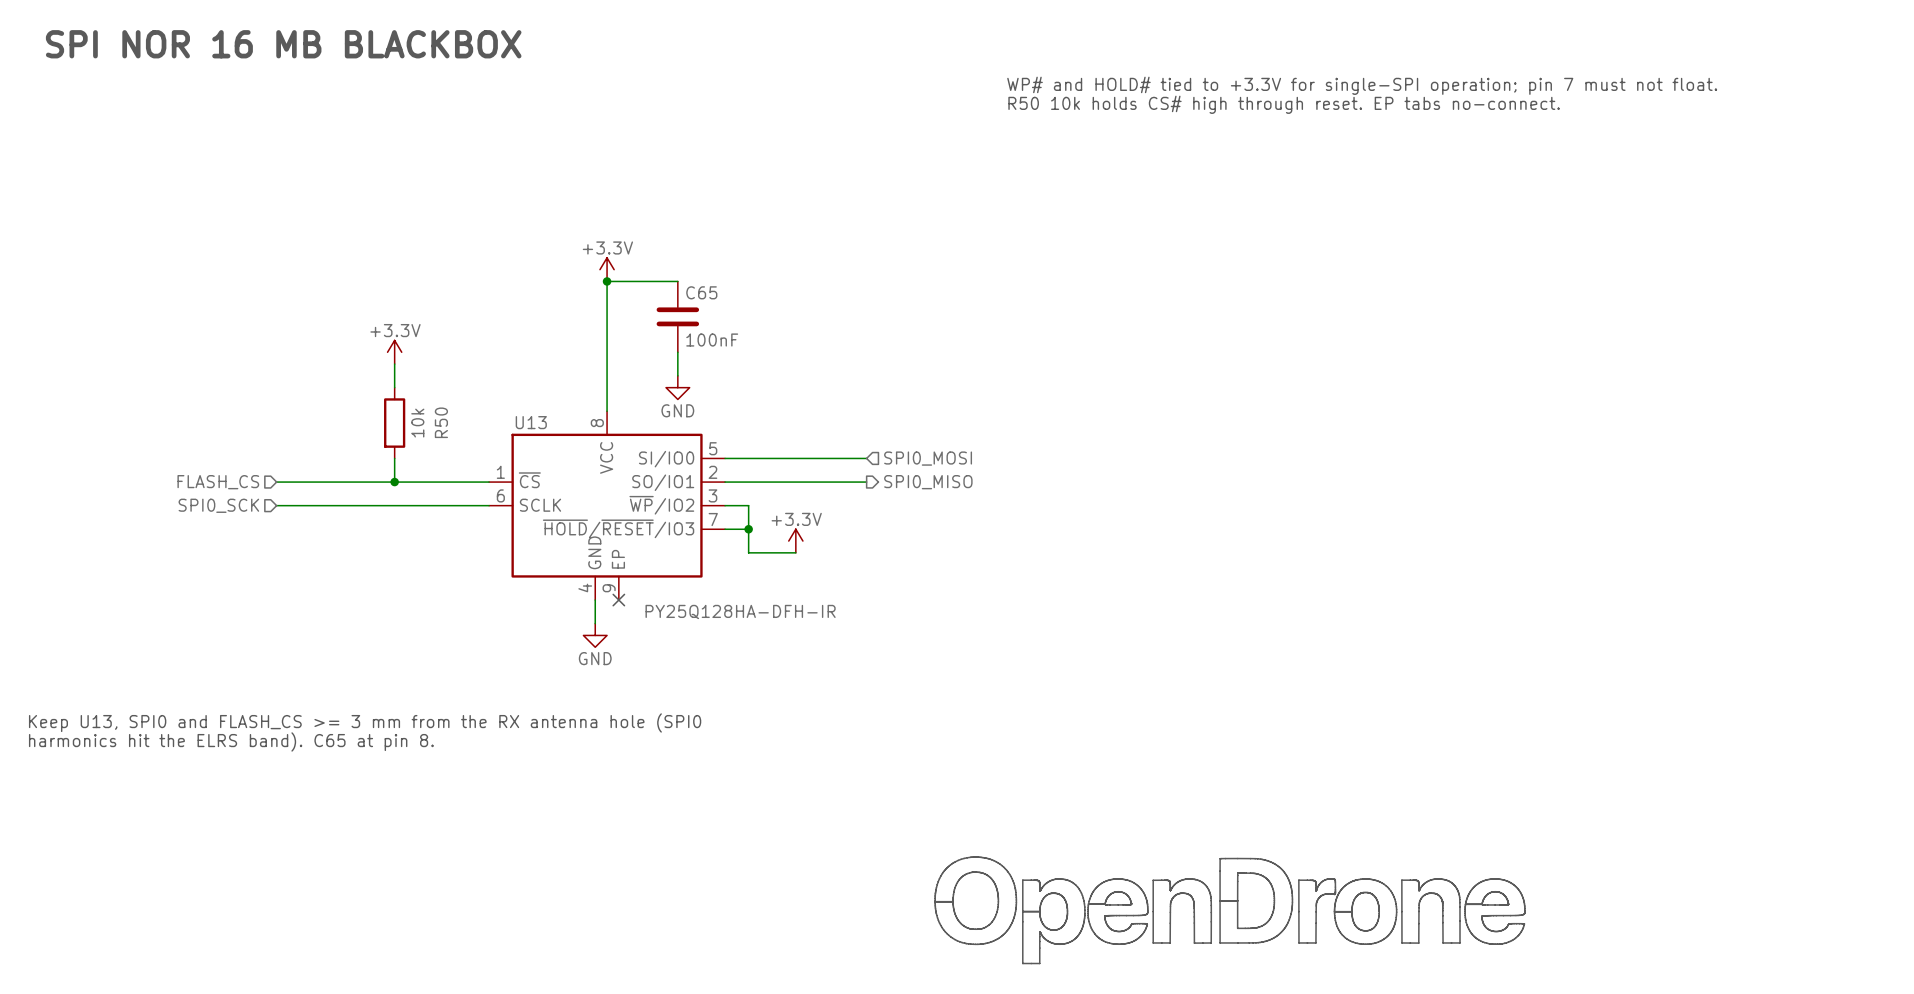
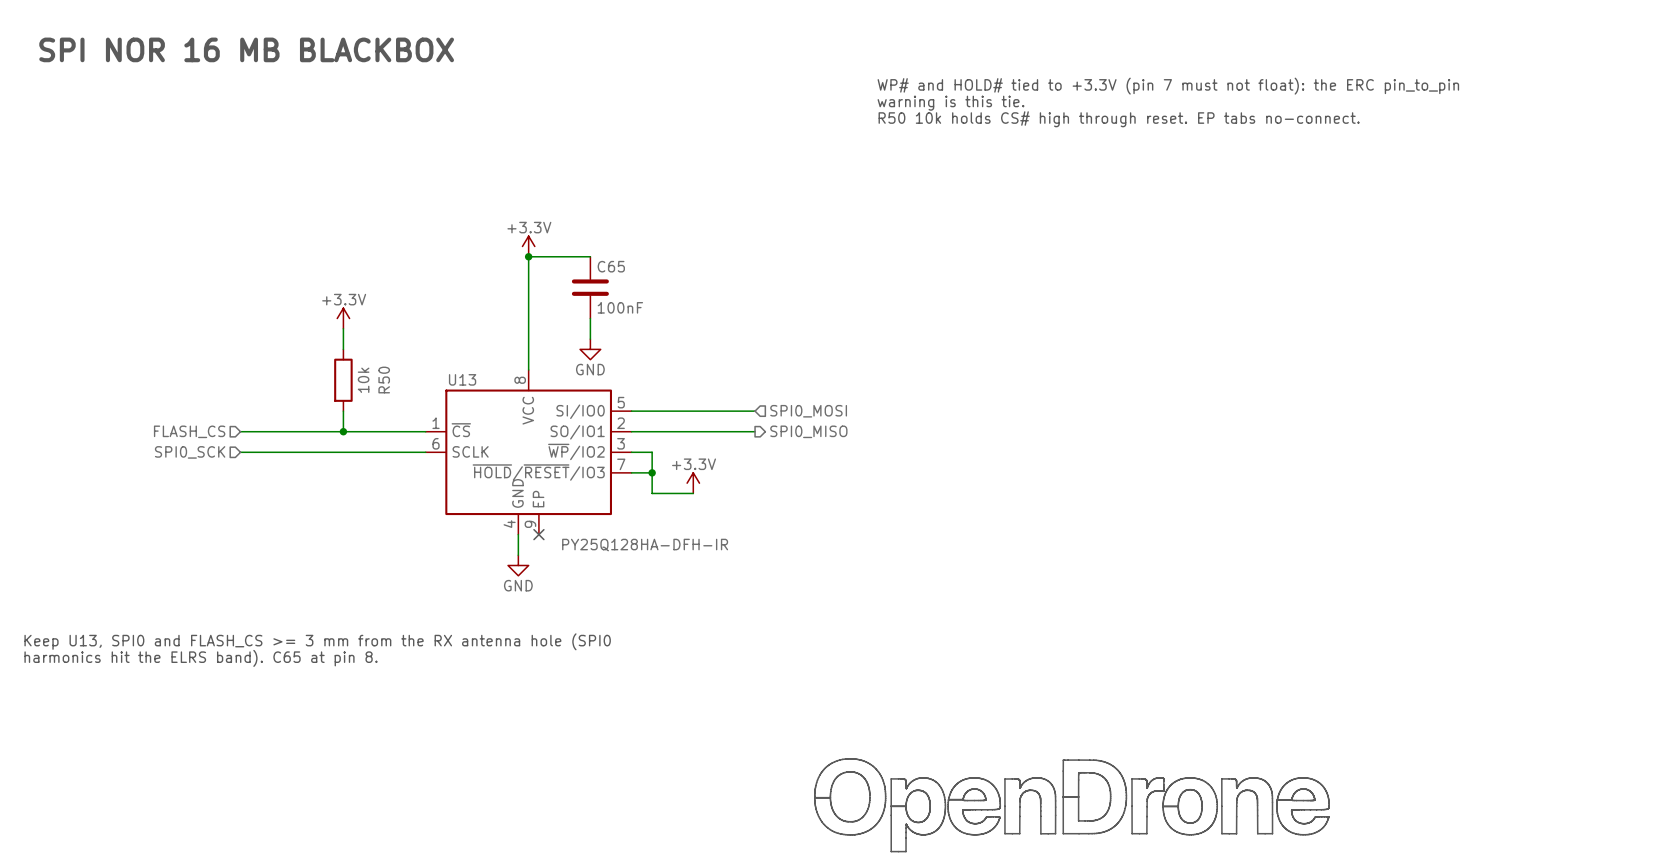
text: WP# and HOLD# tied to +3.3V for single-SPI operation; pin 7 must not float. (1362, 85) -> WP# and HOLD# tied to +3.3V (pin 7 must not float): the ERC pin_to_pin (1168, 86)
text: R50 10k holds CS# high through reset. EP tabs no-connect. (1284, 104) -> warning is this tie. (951, 103)
text: none -> R50 10k holds CS# high through reset. EP tabs no-connect. (1119, 119)

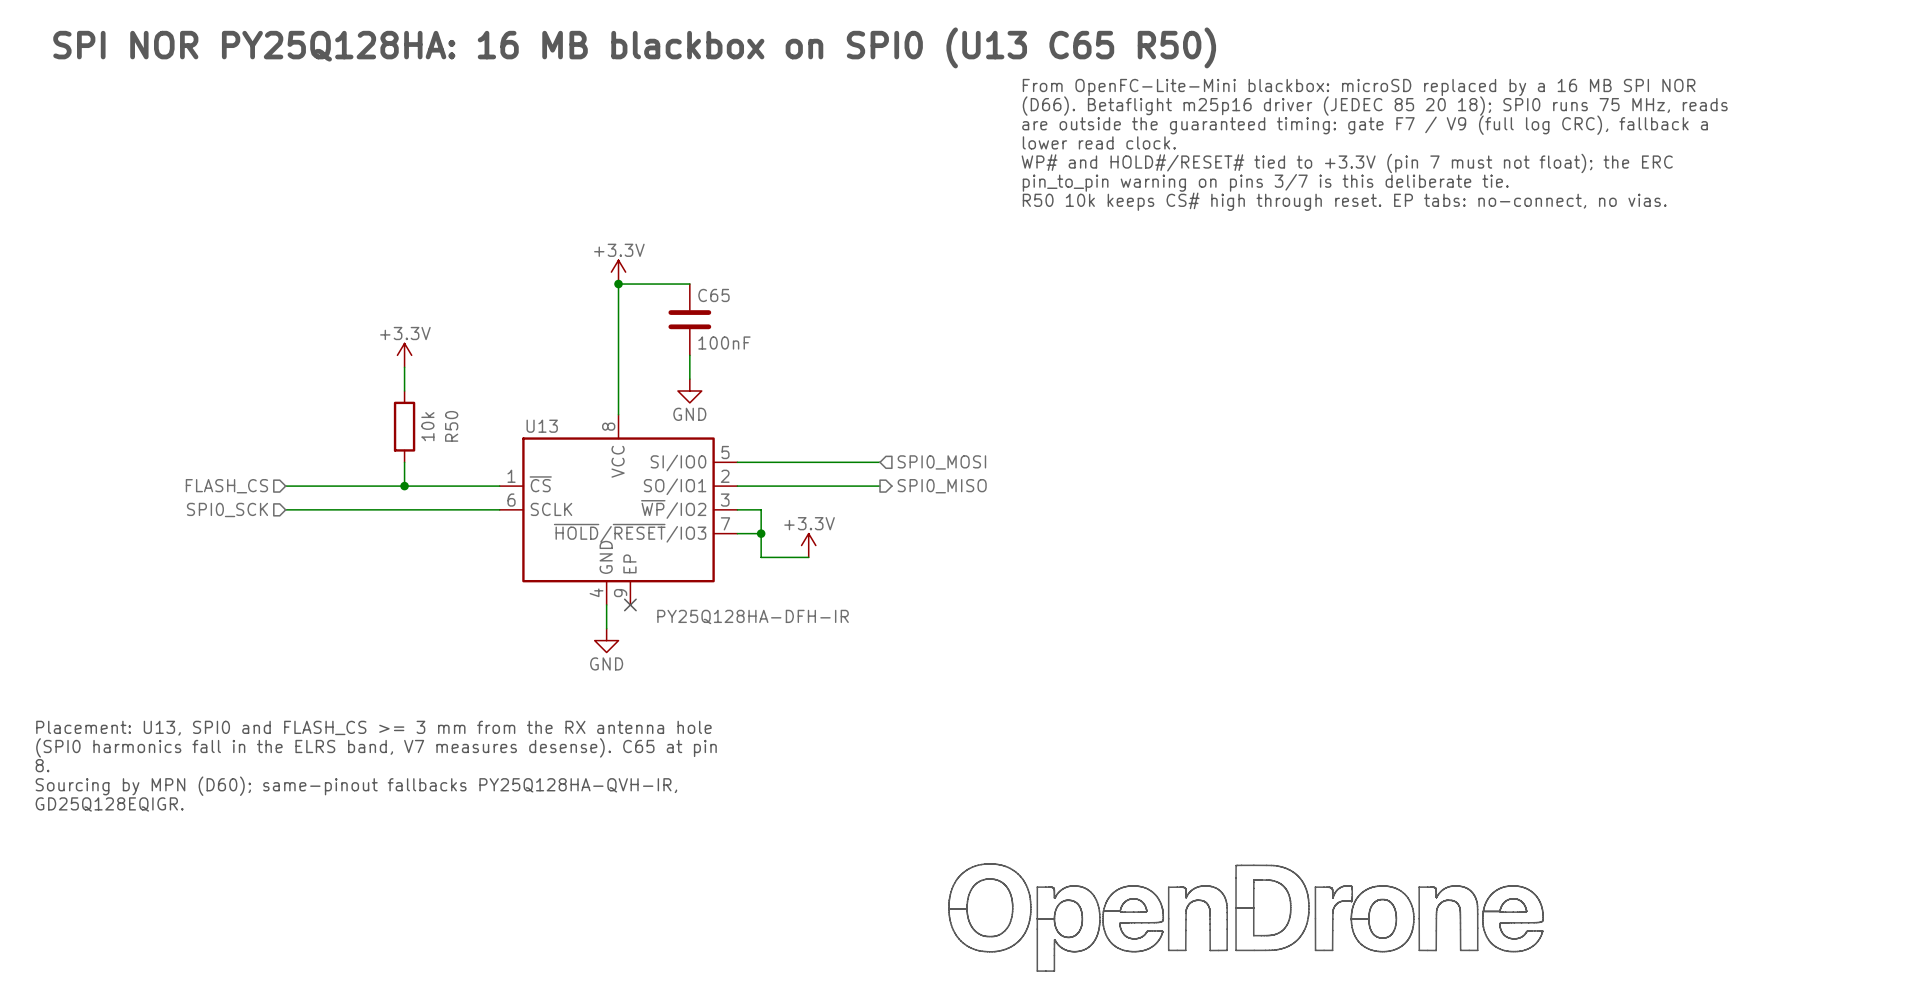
text: SPI NOR 16 MB BLACKBOX (246, 49) -> SPI NOR PY25Q128HA: 16 MB blackbox on SPI0 (U13 C65 R50) (634, 47)
text: WP# and HOLD# tied to +3.3V (pin 7 must not float): the ERC pin_to_pin (1168, 86) -> From OpenFC-Lite-Mini blackbox: microSD replaced by a 16 MB SPI NOR (1359, 87)
text: warning is this tie. (951, 103) -> (D66). Betaflight m25p16 driver (JEDEC 85 20 18); SPI0 runs 75 MHz, reads (1375, 106)
text: R50 10k holds CS# high through reset. EP tabs no-connect. (1119, 119) -> are outside the guaranteed timing: gate F7 / V9 (full log CRC), fallback a (1365, 125)
text: none -> lower read clock. (1099, 142)
text: none -> WP# and HOLD#/RESET# tied to +3.3V (pin 7 must not float); the ERC (1347, 163)
text: none -> pin_to_pin warning on pins 3/7 is this deliberate tie. (1265, 182)
text: none -> R50 10k keeps CS# high through reset. EP tabs: no-connect, no vias. (1344, 201)
text: Keep U13, SPI0 and FLASH_CS >= 3 mm from the RX antenna hole (SPI0 (317, 641) -> Placement: U13, SPI0 and FLASH_CS >= 3 mm from the RX antenna hole (373, 728)
text: harmonics hit the ELRS band). C65 at pin 8. (201, 658) -> (SPI0 harmonics fall in the ELRS band, V7 measures desense). C65 at pin (376, 747)
text: none -> 8. (42, 765)
text: none -> Sourcing by MPN (D60); same-pinout fallbacks PY25Q128HA-QVH-IR, (356, 786)
text: none -> GD25Q128EQIGR. (109, 804)

